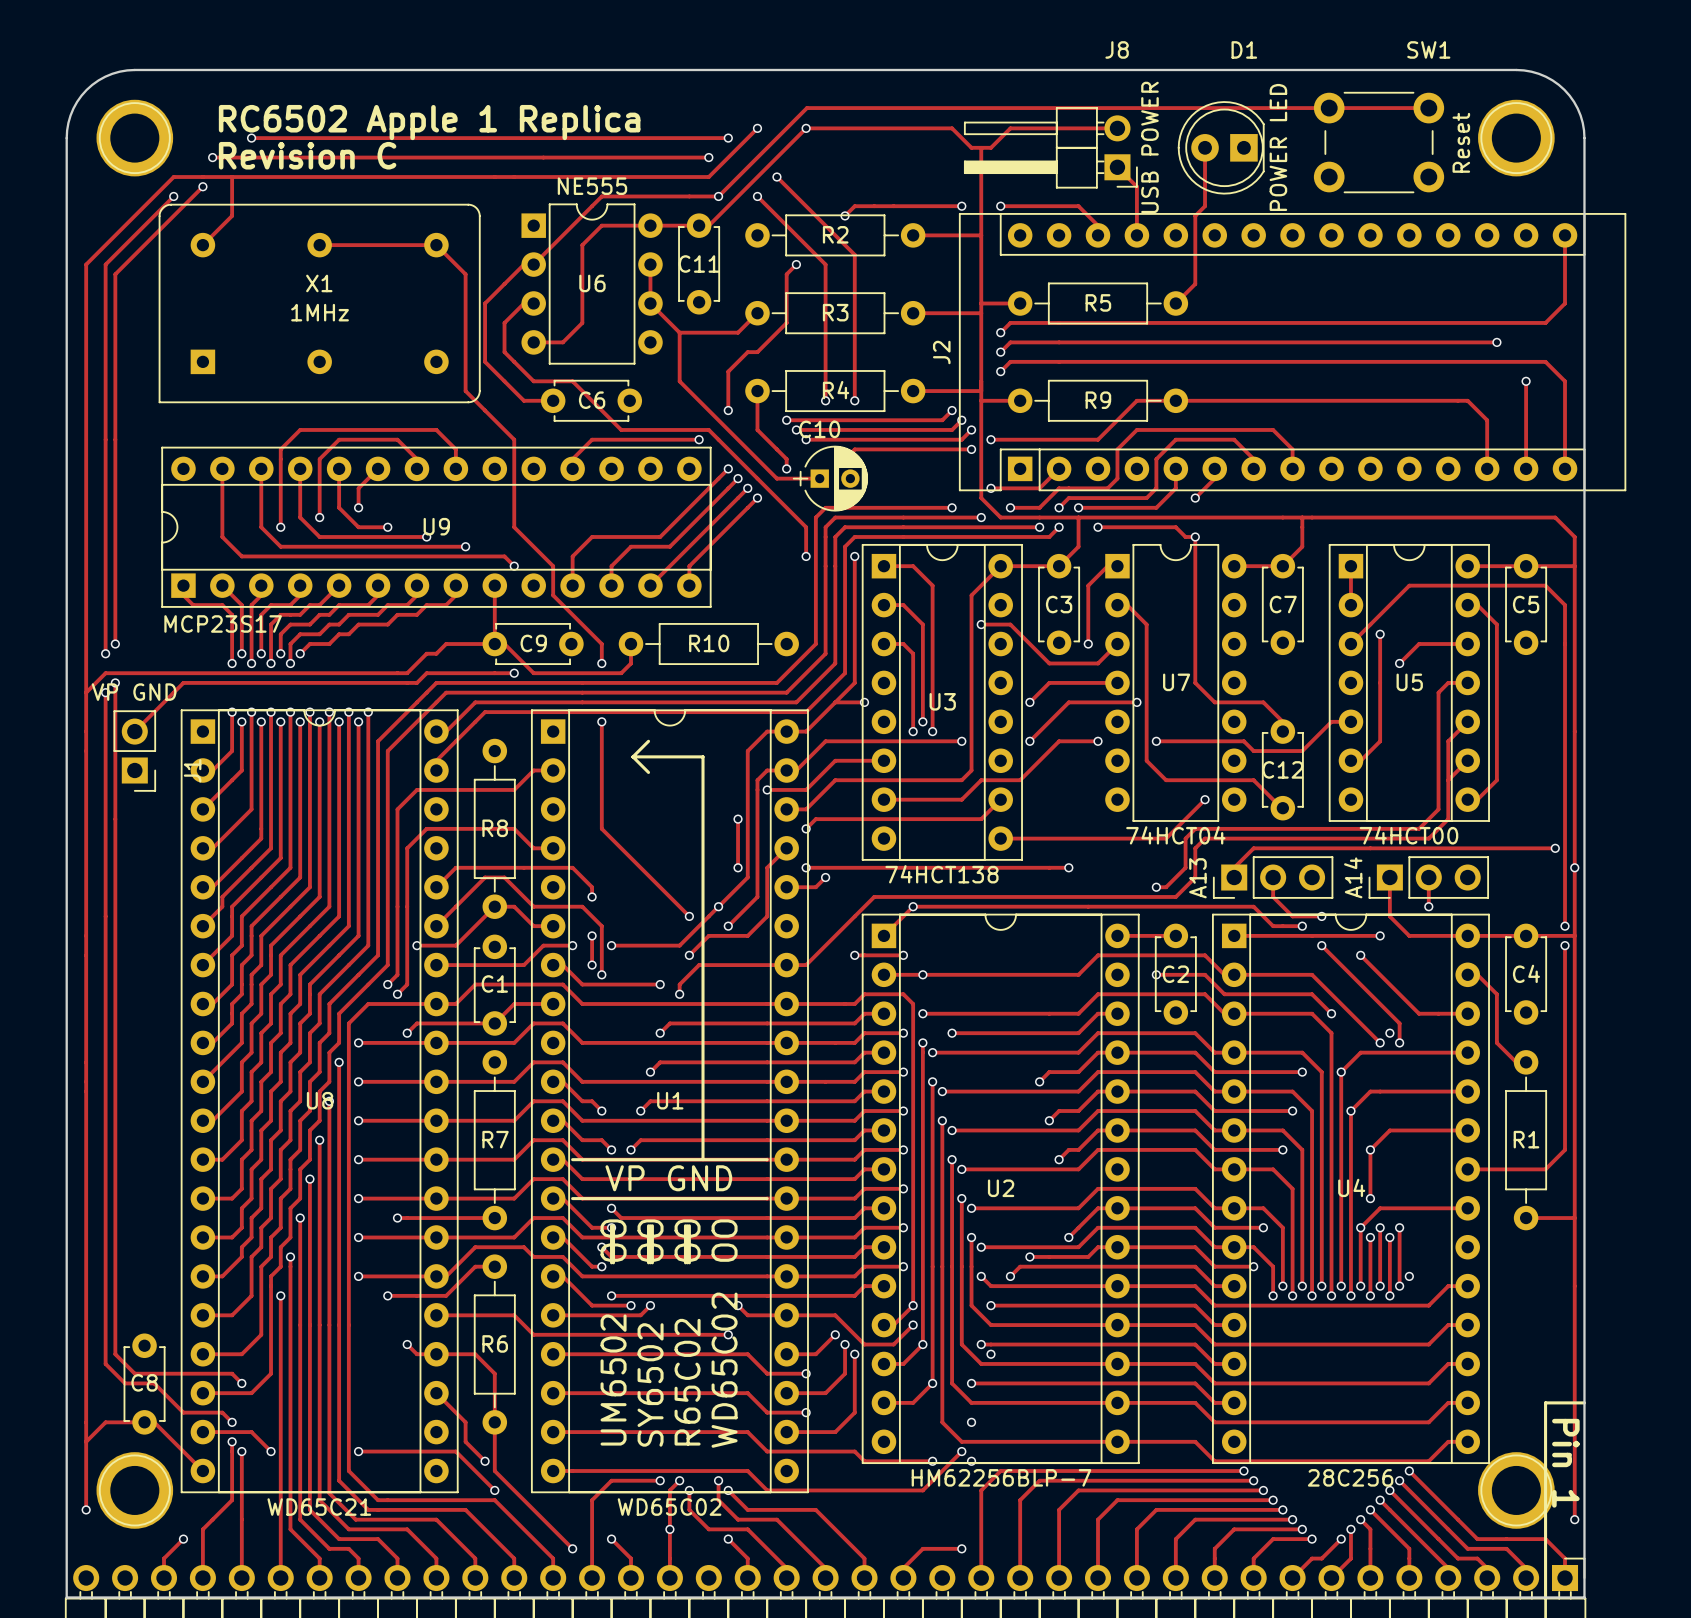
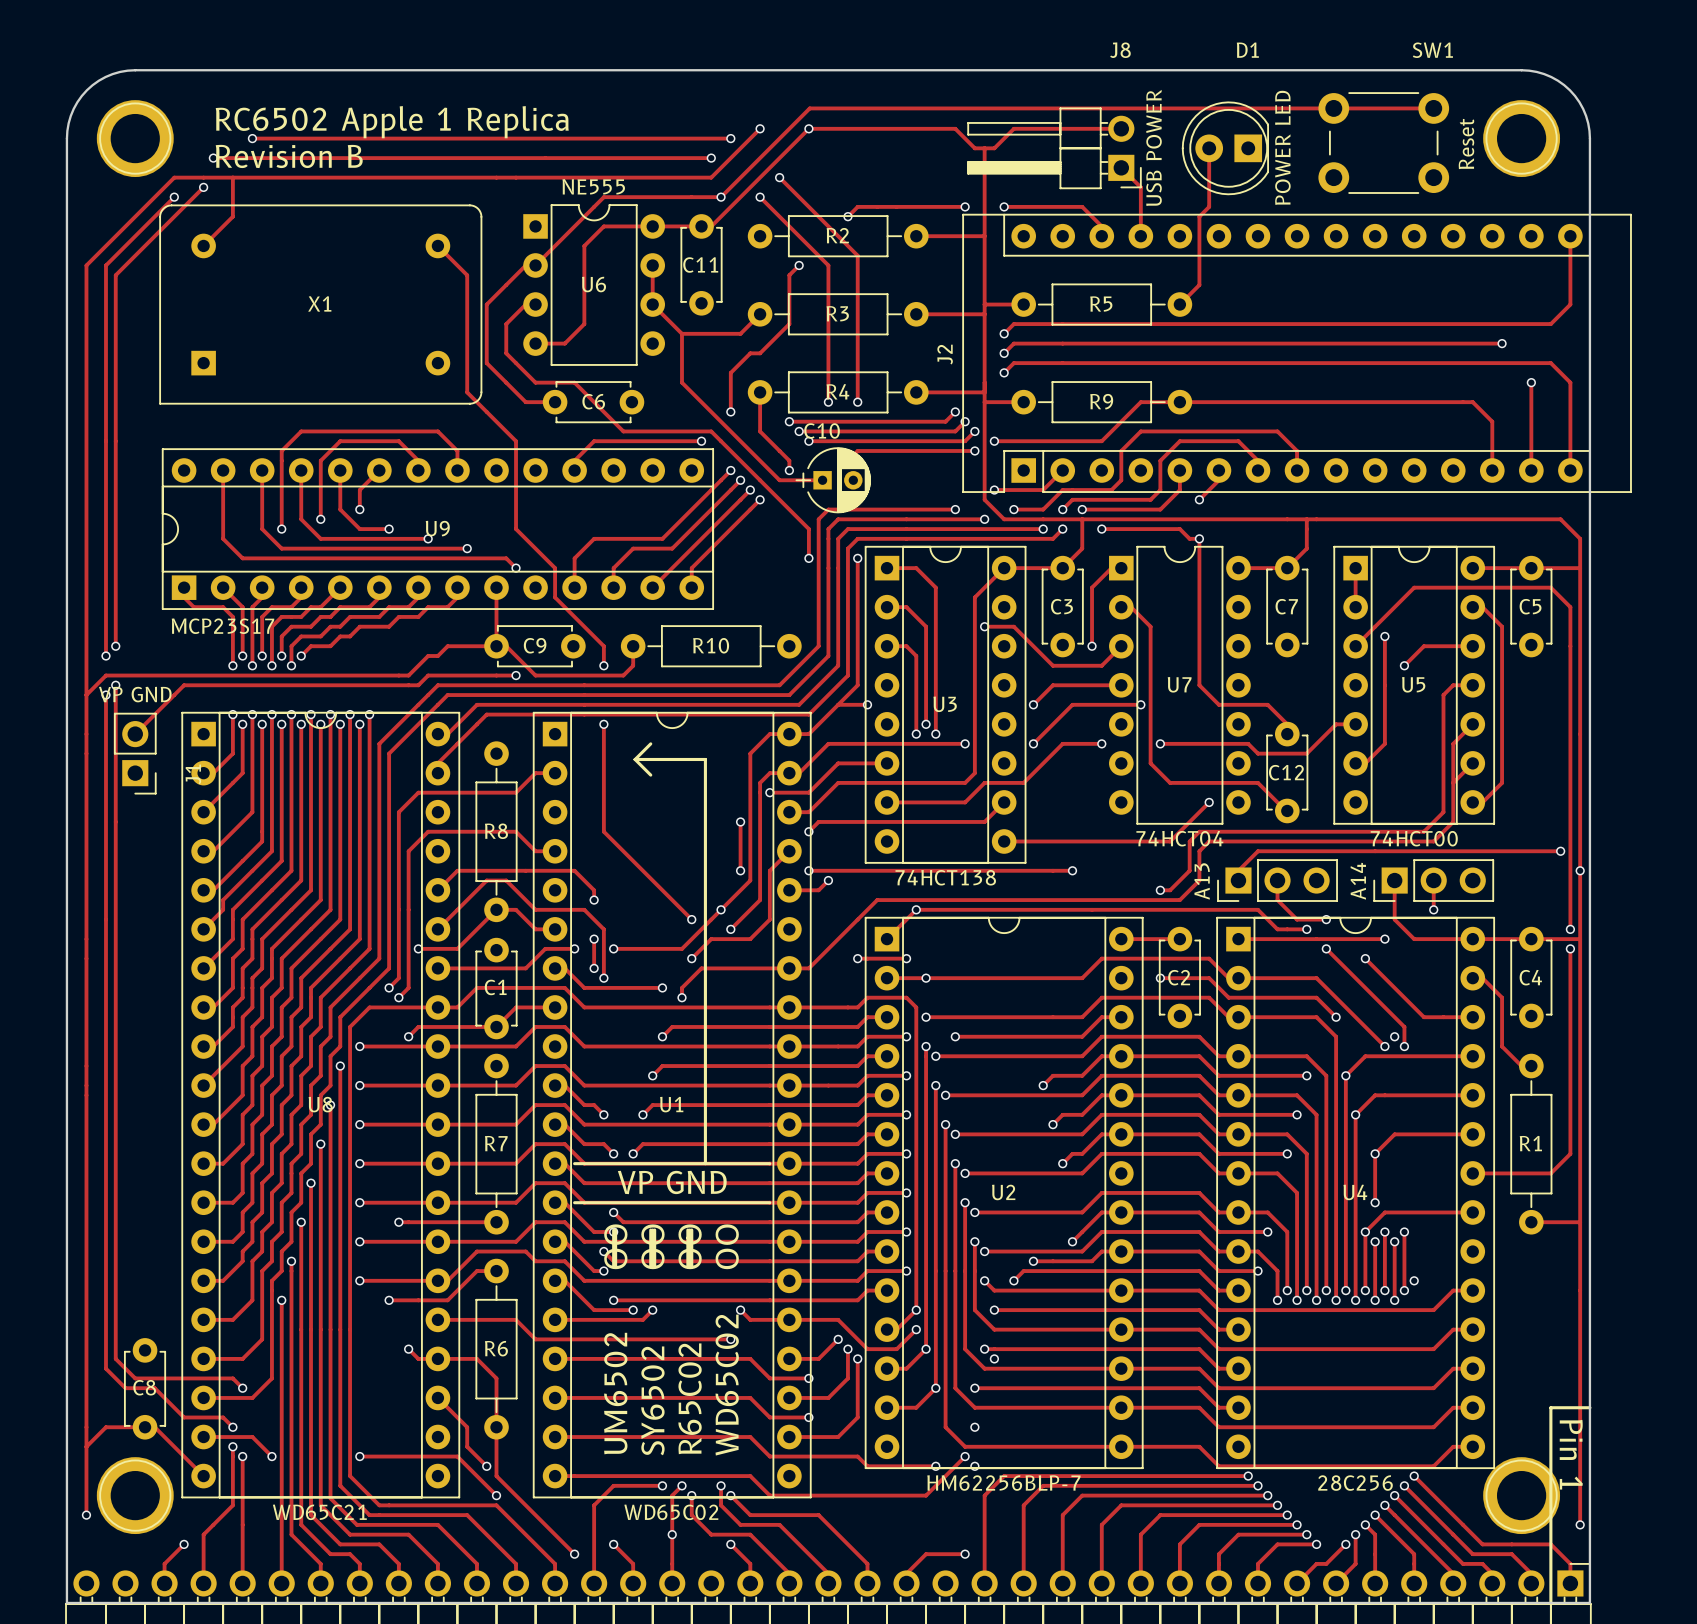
text: Revision C (307, 155) -> Revision B (289, 156)
X1 footprint: [158, 203, 481, 404] -> [159, 204, 483, 405]
track: (319, 245) (436, 245) -> none
X1 value: 1MHz (320, 312) -> none

